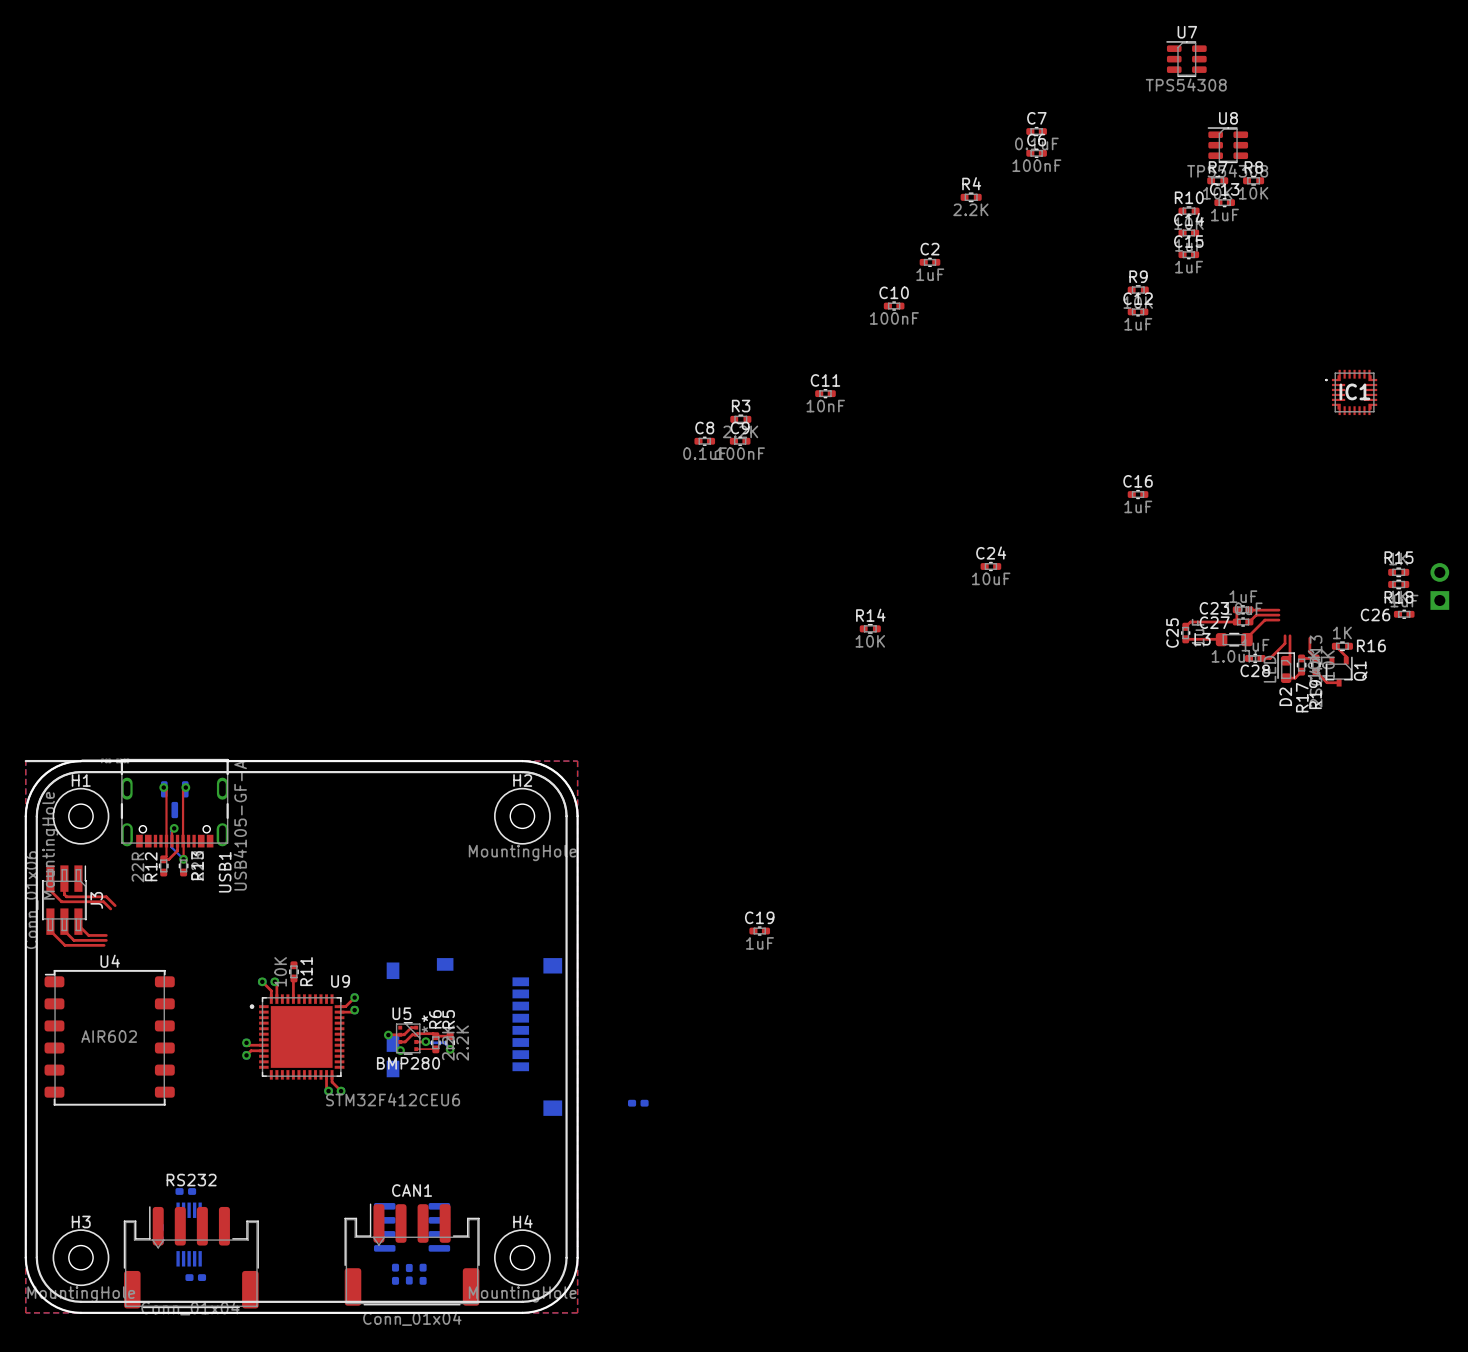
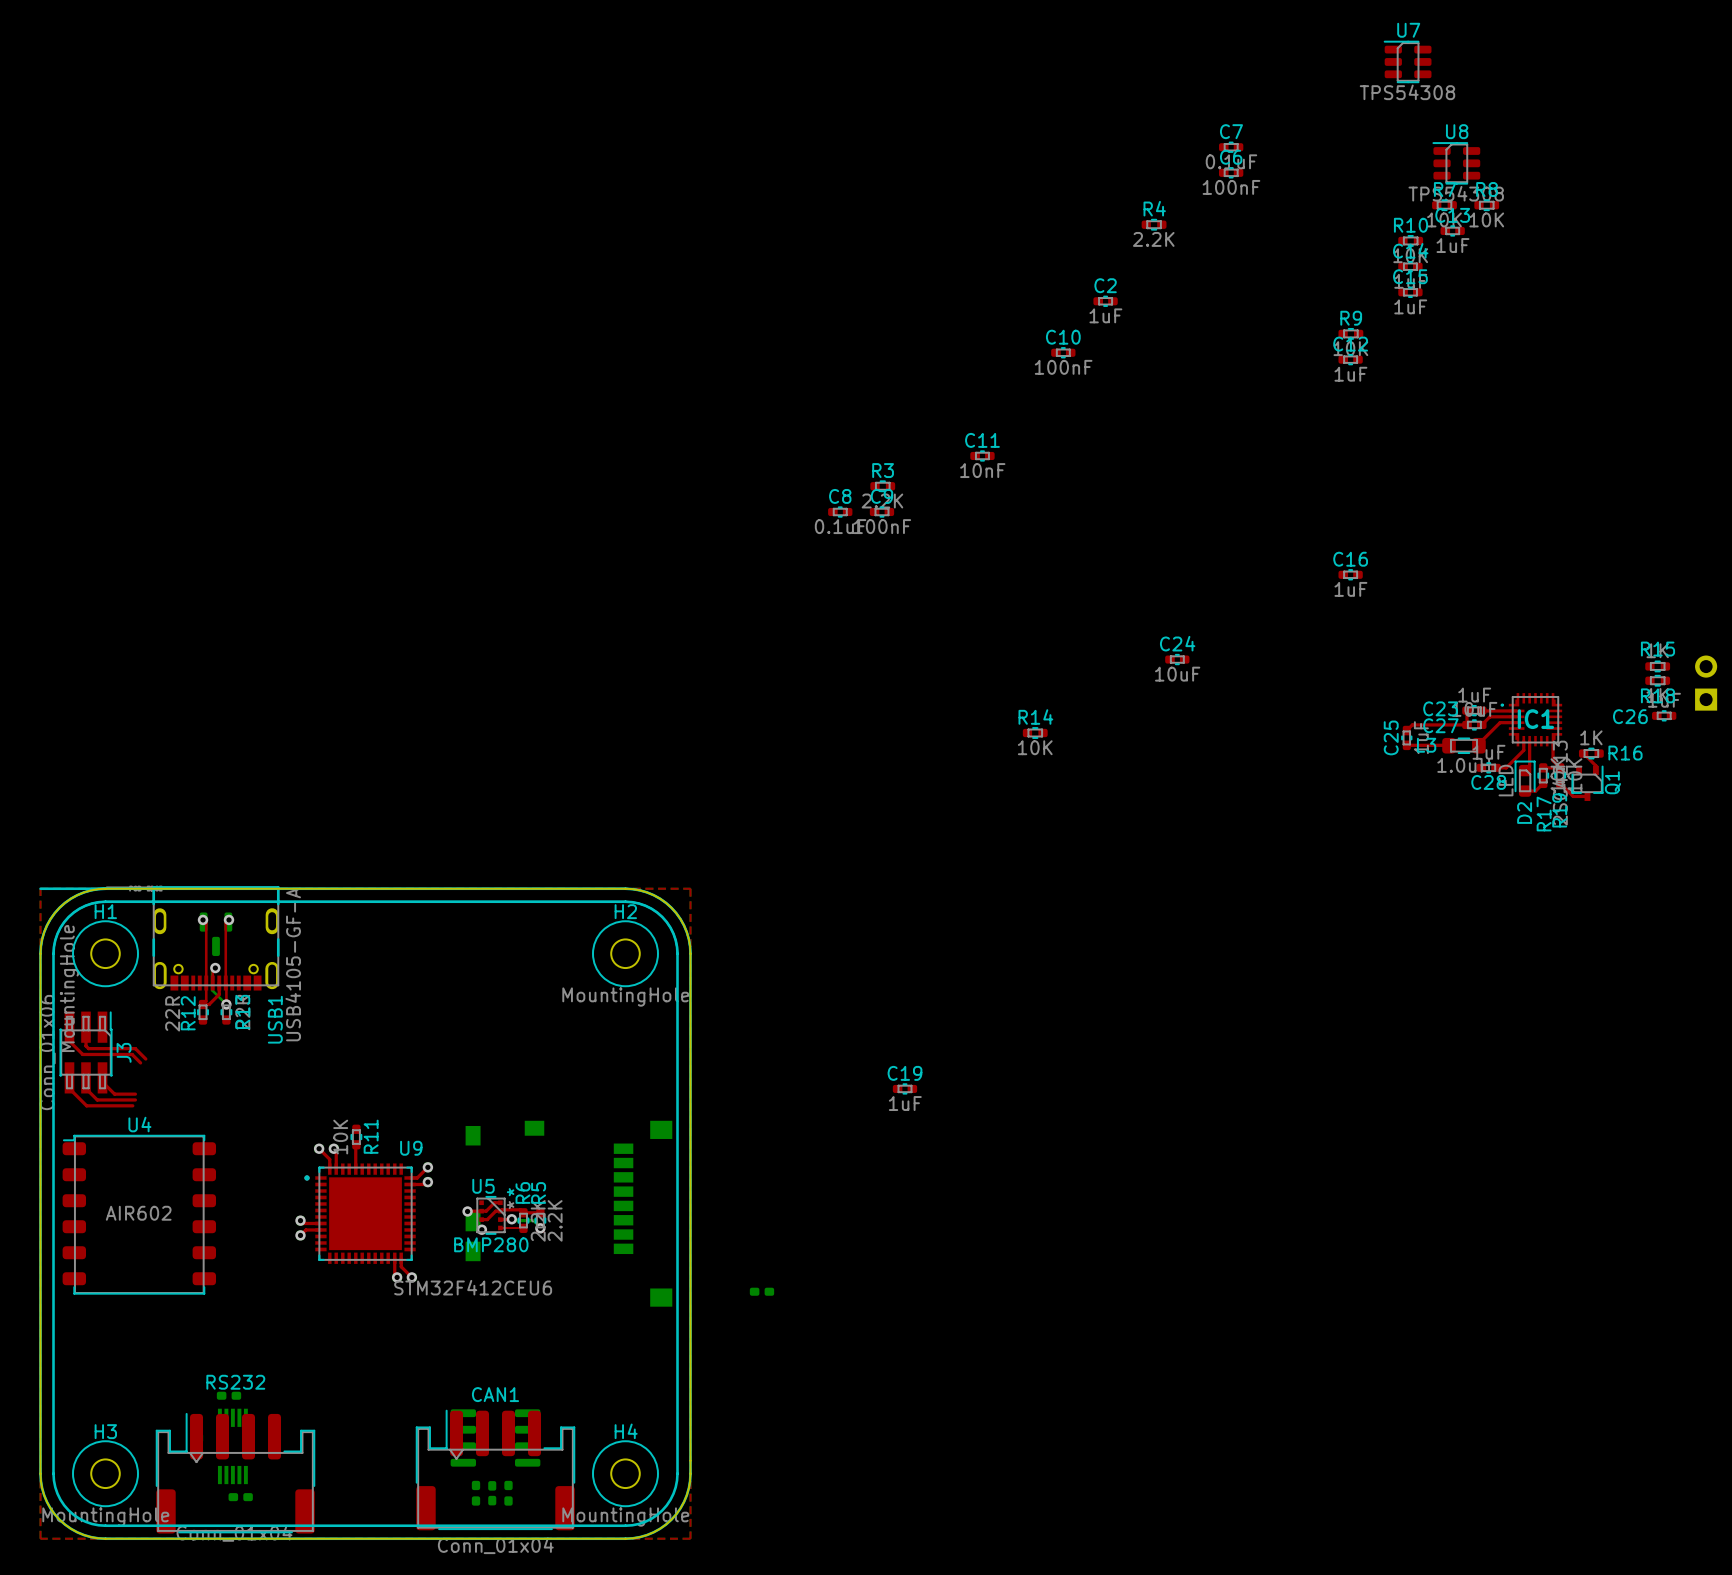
IC1 position: (1351, 392) -> (1531, 719)

